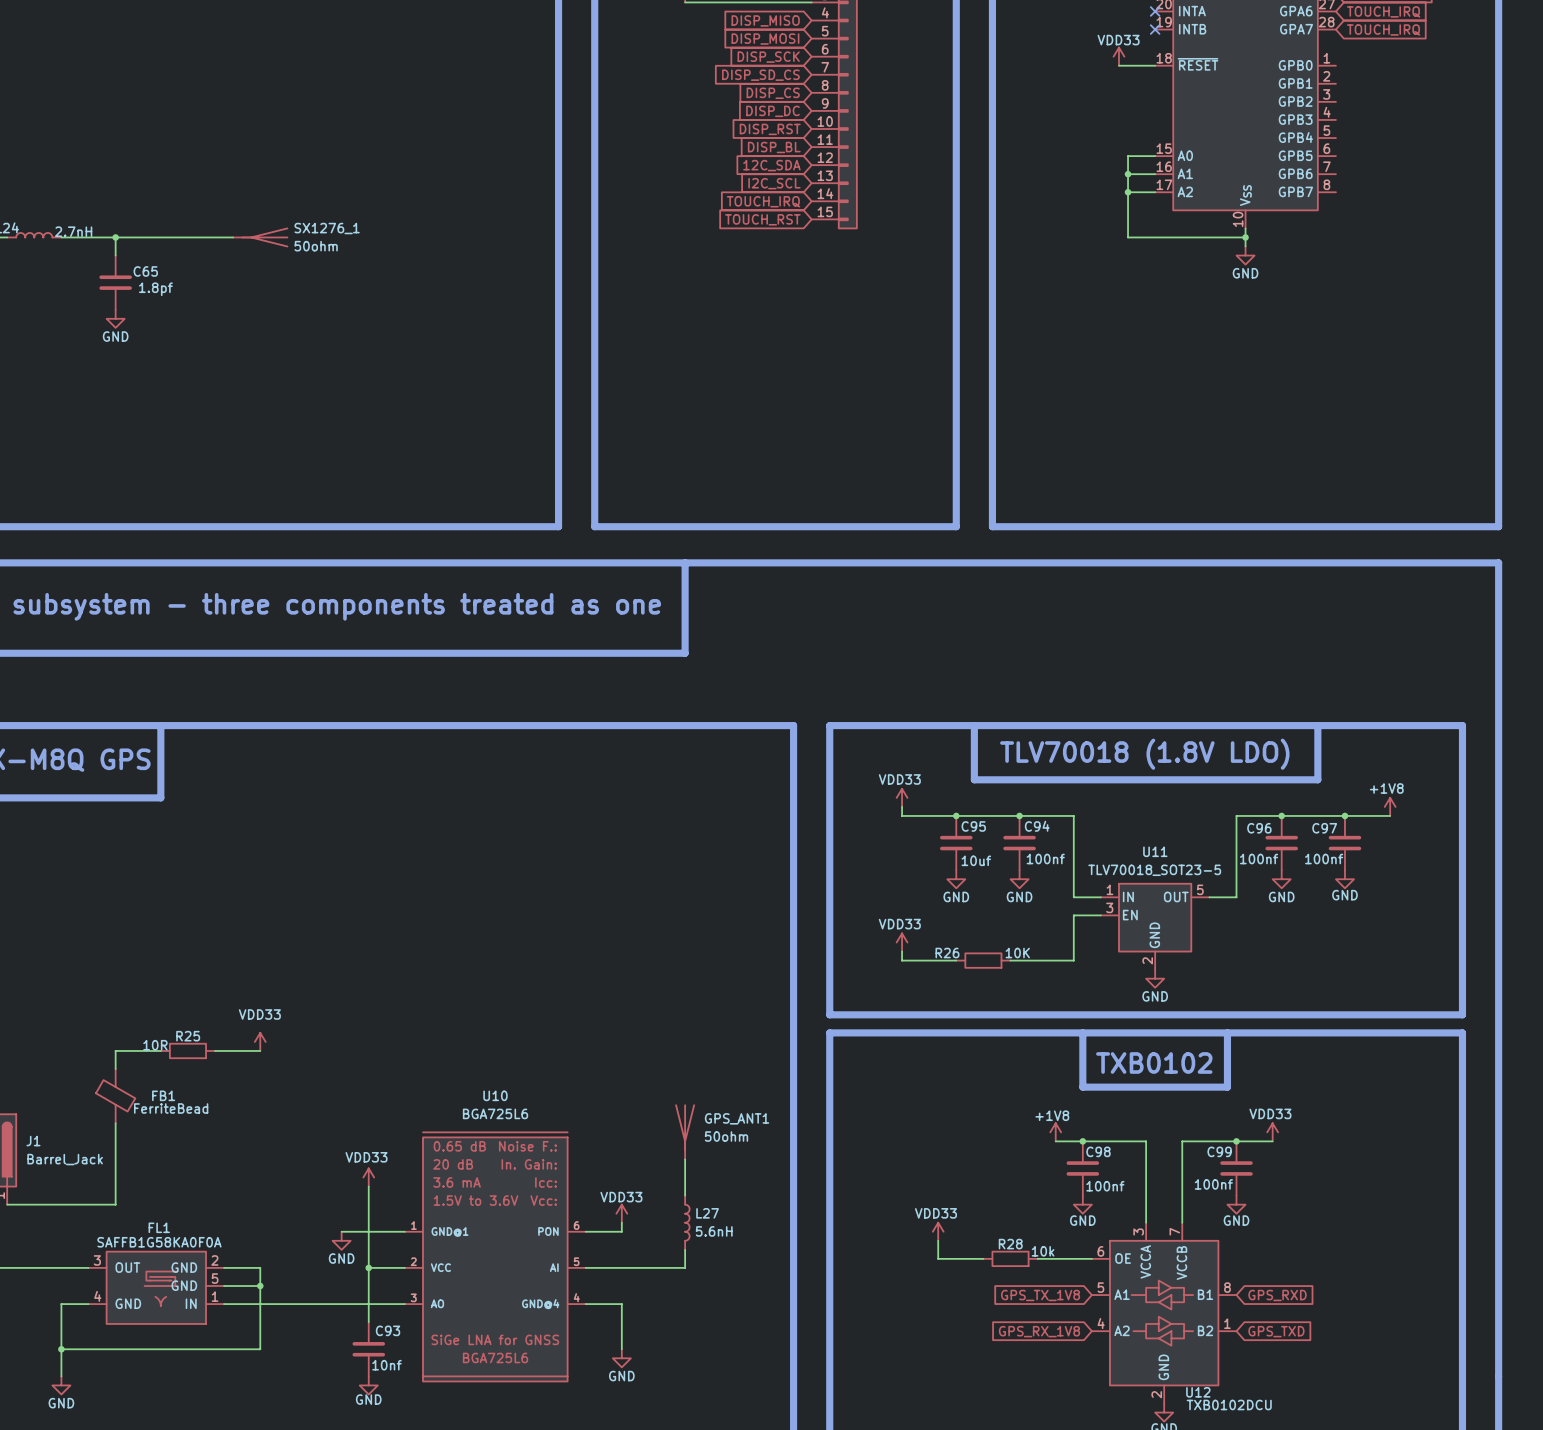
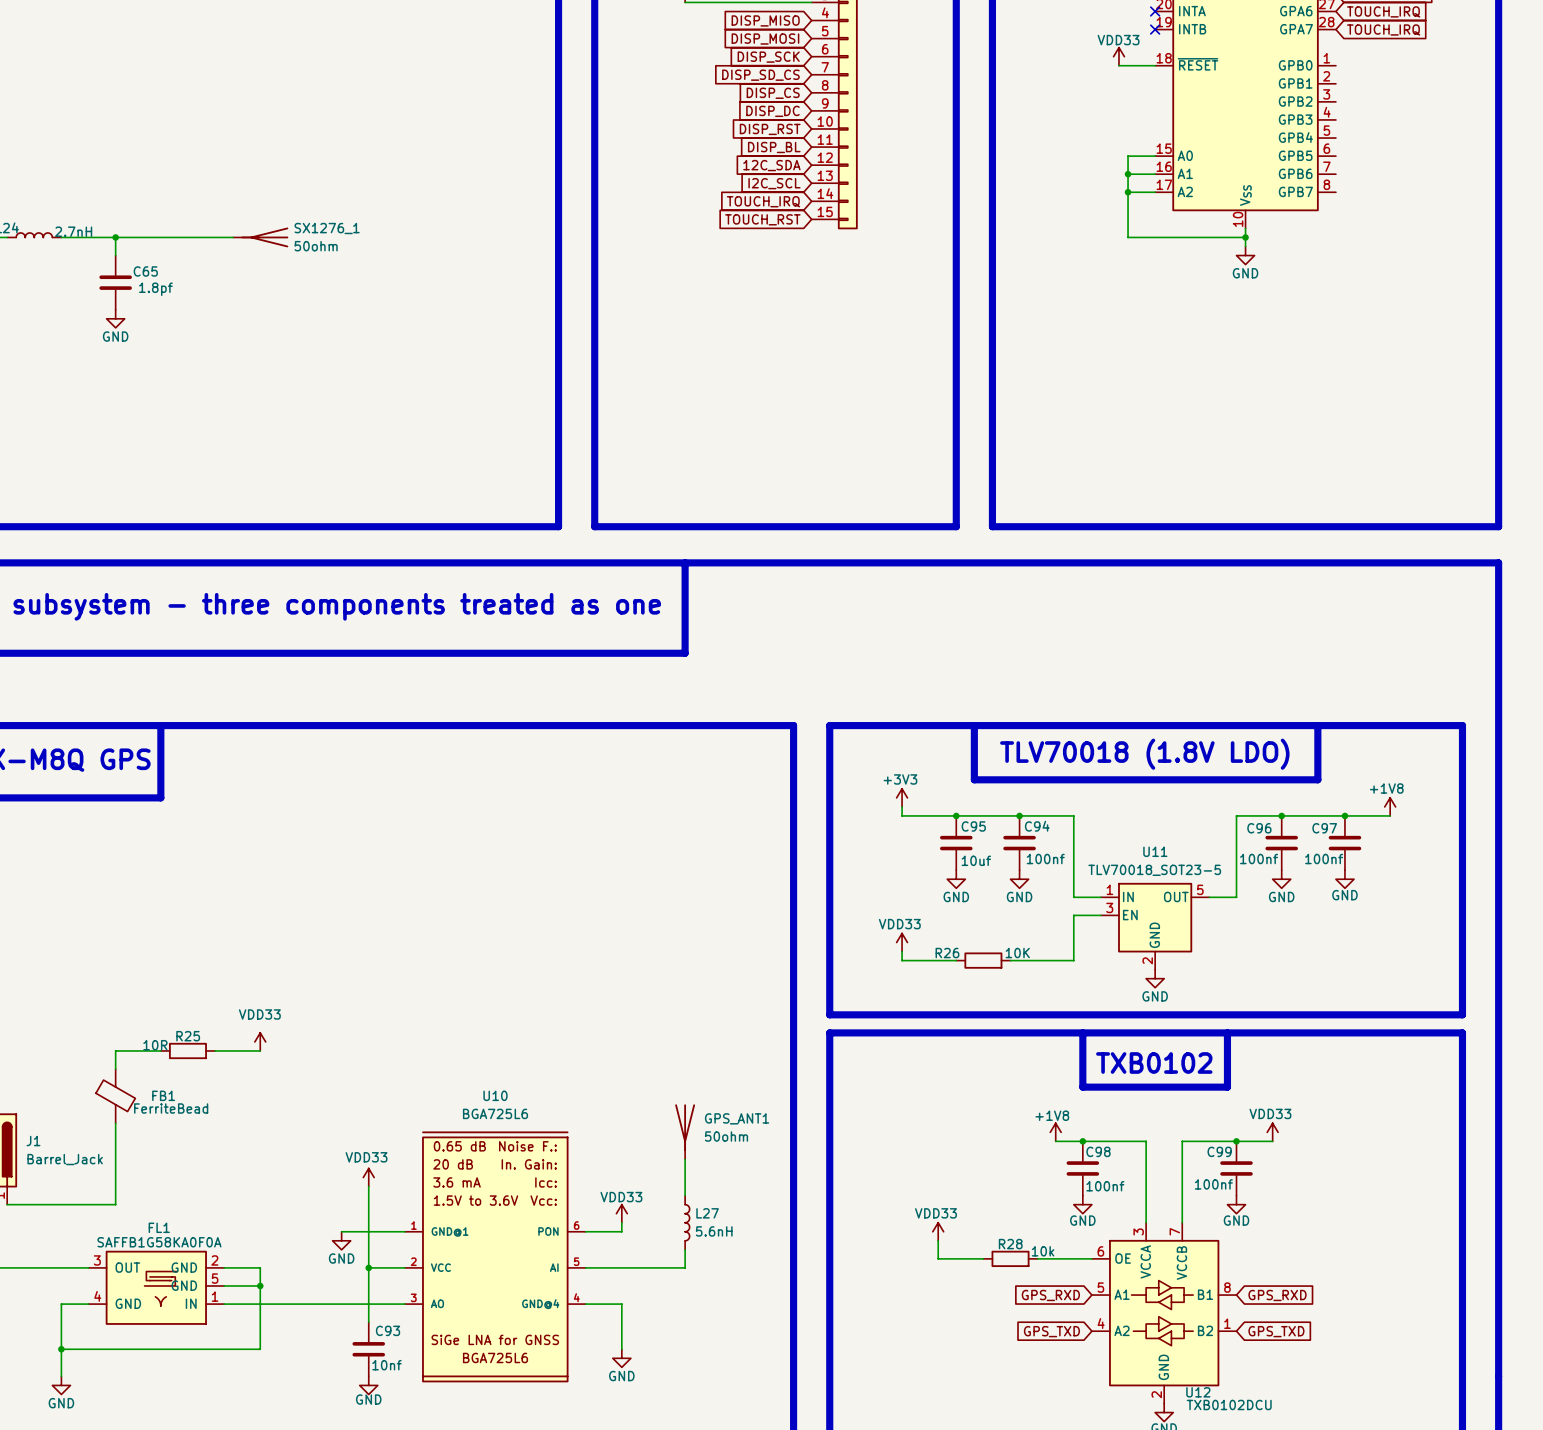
power symbol: VDD33 (902, 797) -> +3V3 (902, 797)
global label: GPS_TX_1V8 (1040, 1295) -> GPS_RXD (1050, 1295)
global label: GPS_RX_1V8 (1039, 1331) -> GPS_TXD (1051, 1331)

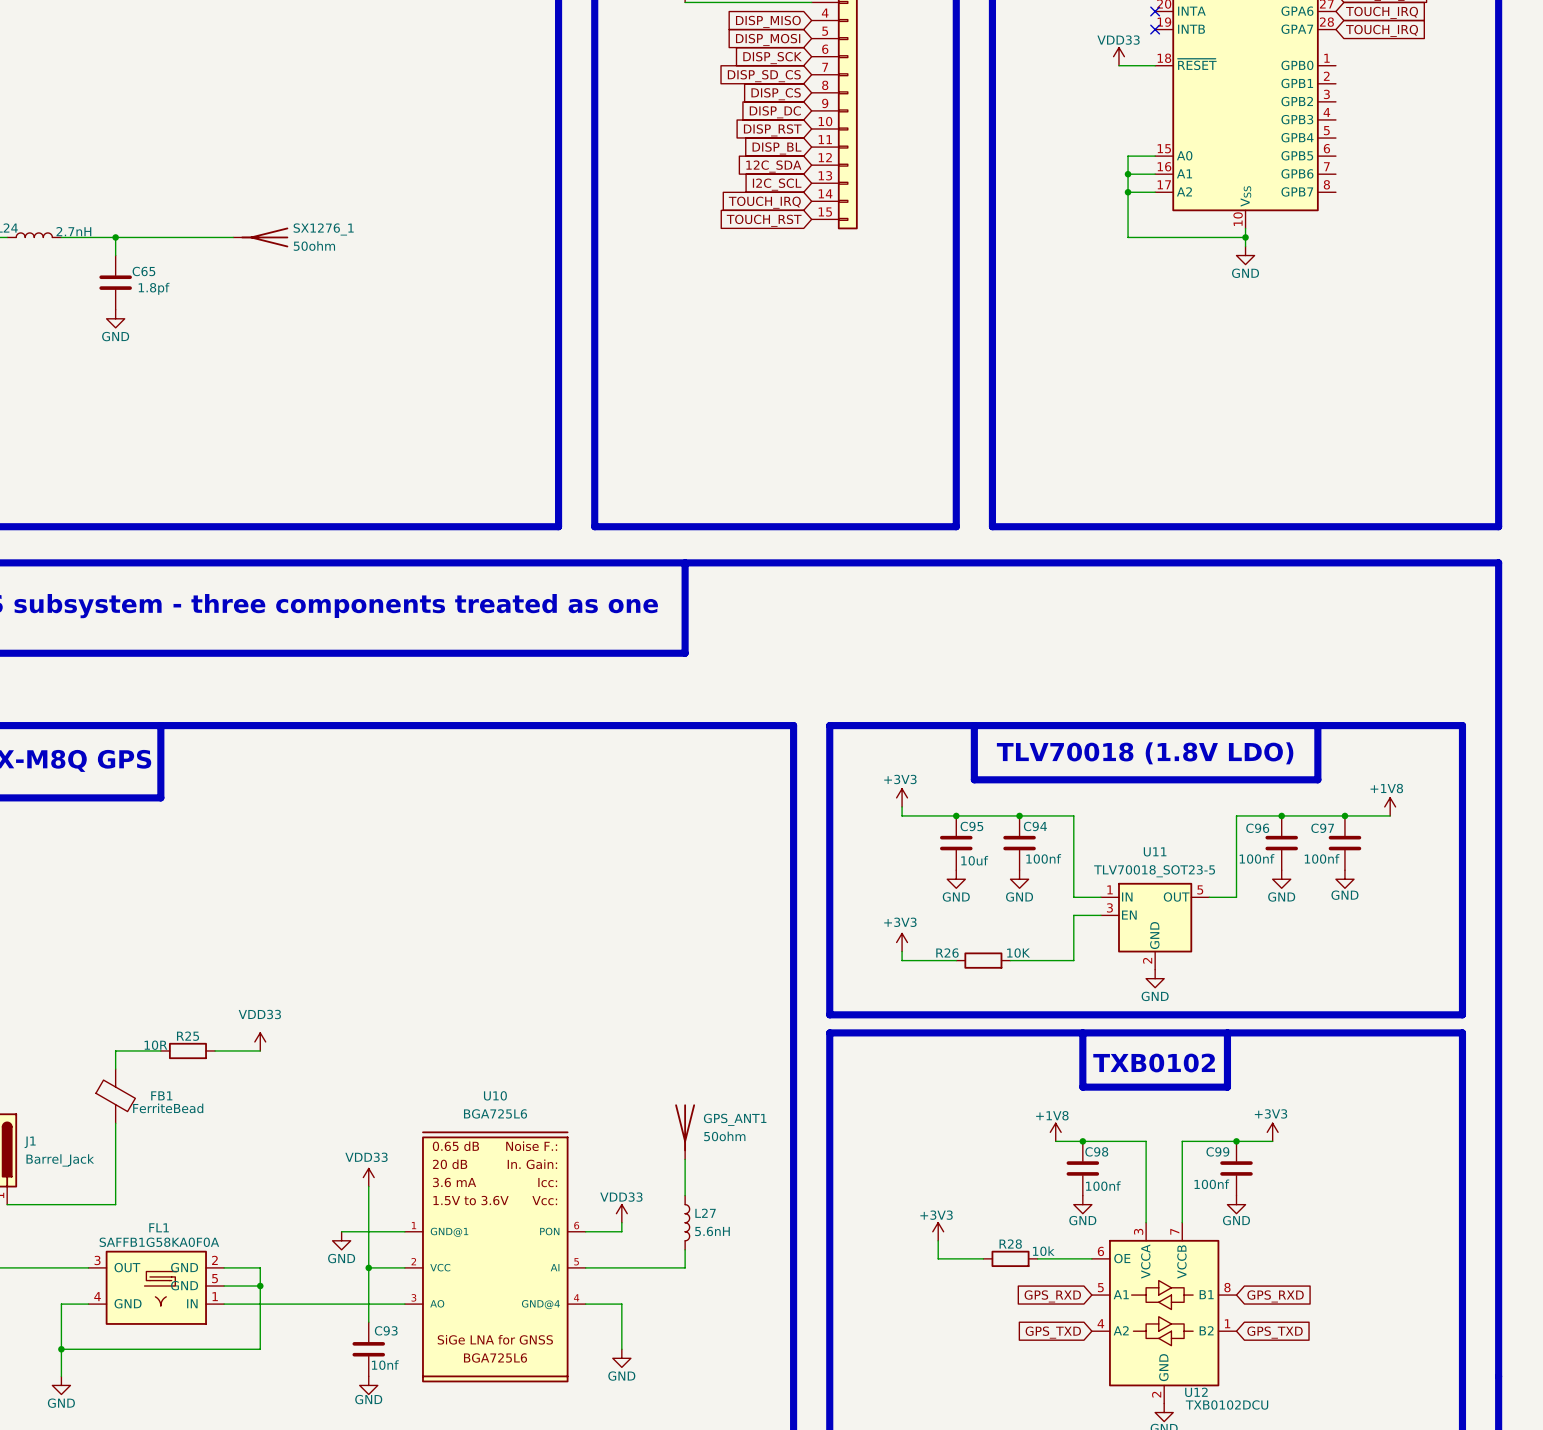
power symbol: VDD33 (902, 942) -> +3V3 (902, 942)
power symbol: VDD33 (1272, 1132) -> +3V3 (1272, 1132)
power symbol: VDD33 (938, 1231) -> +3V3 (938, 1231)

